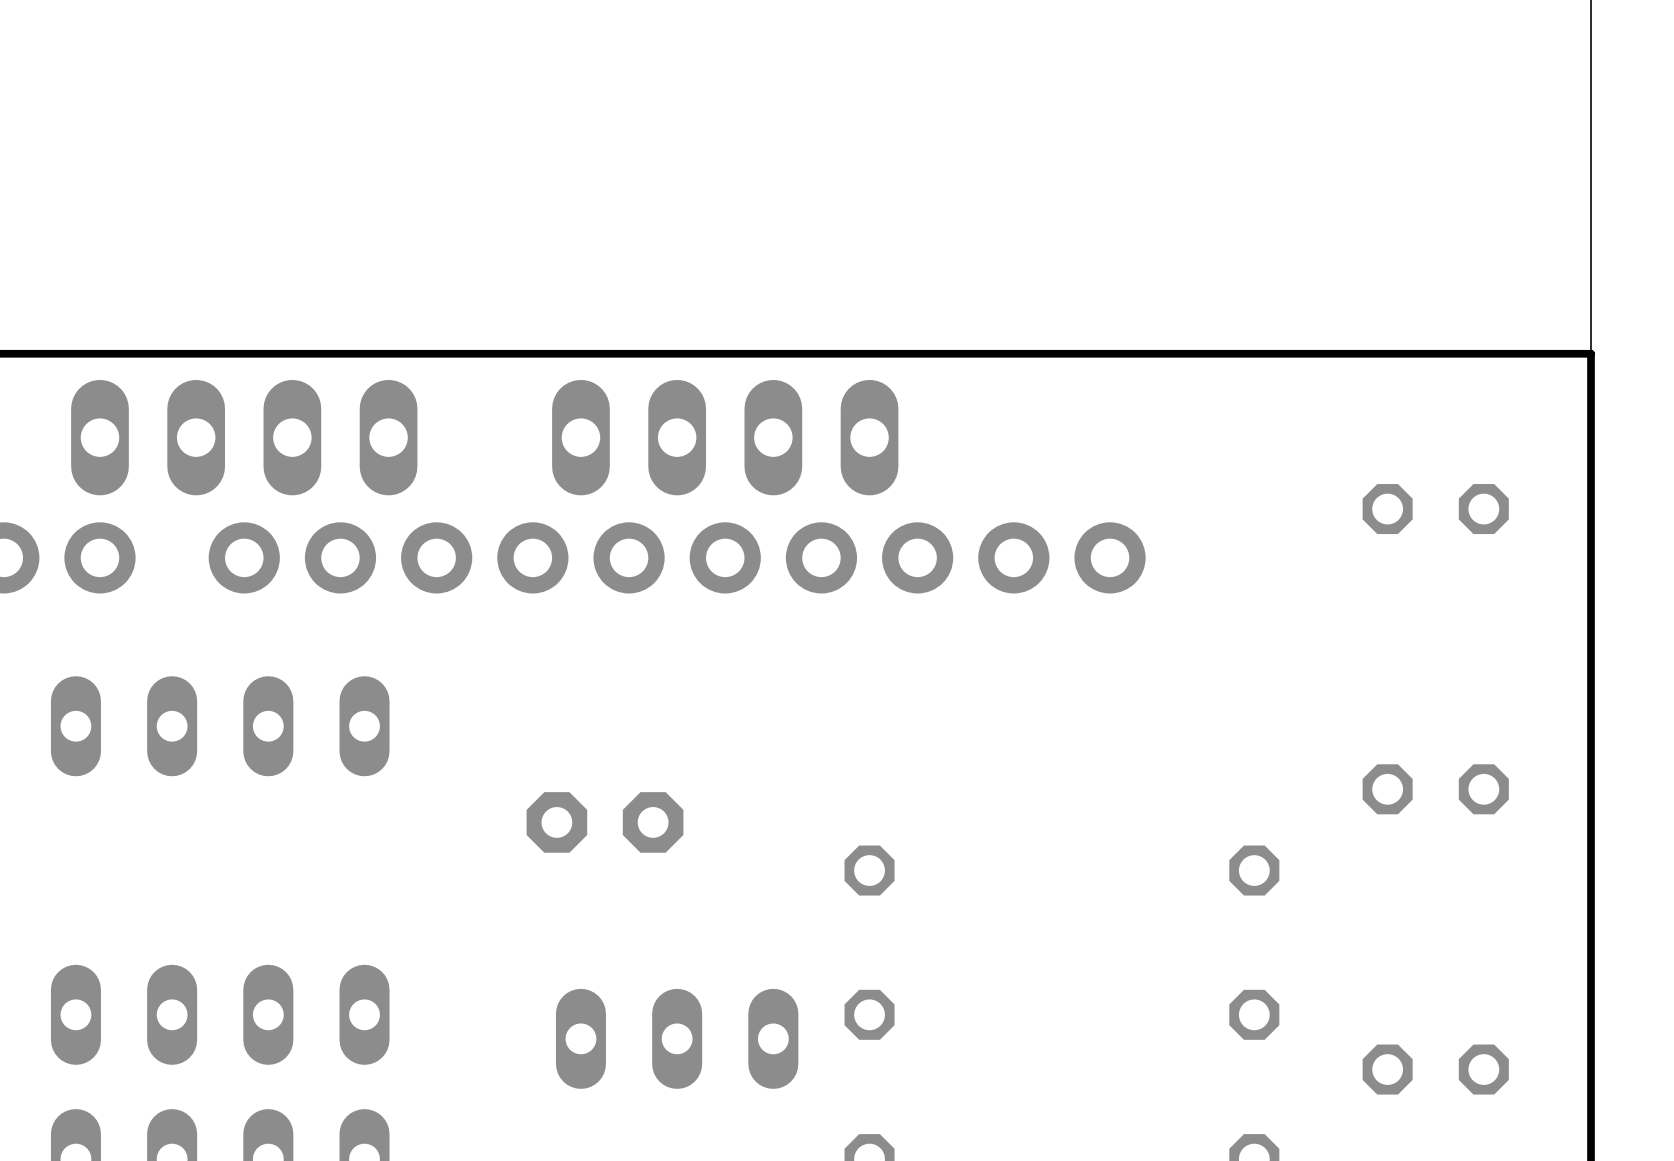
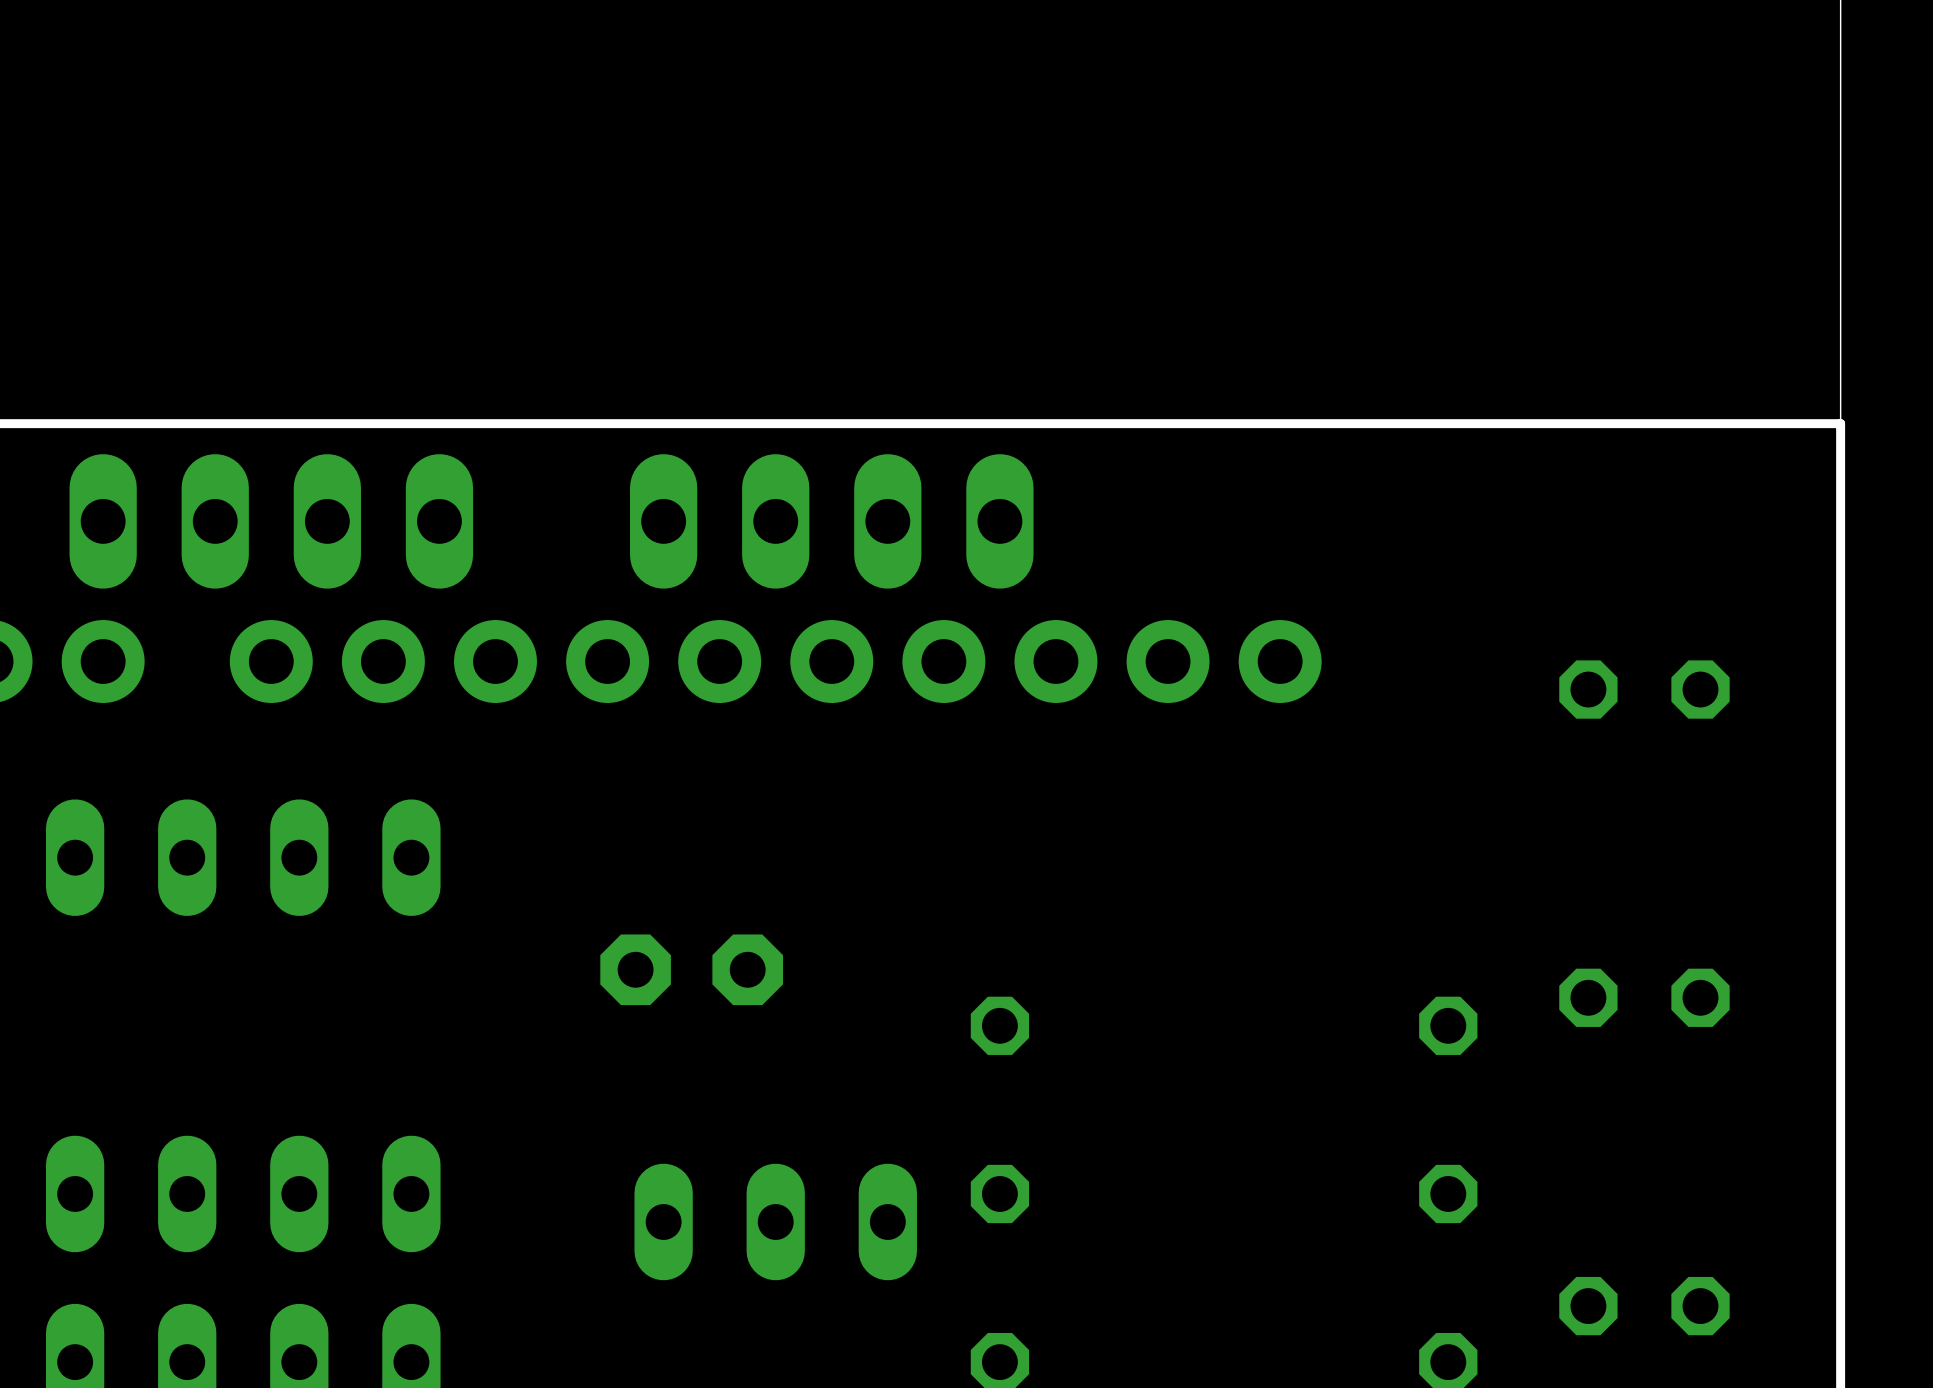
part position: (1435, 509) -> (1644, 689)
part position: (1435, 789) -> (1644, 997)
part position: (1435, 1069) -> (1644, 1306)

